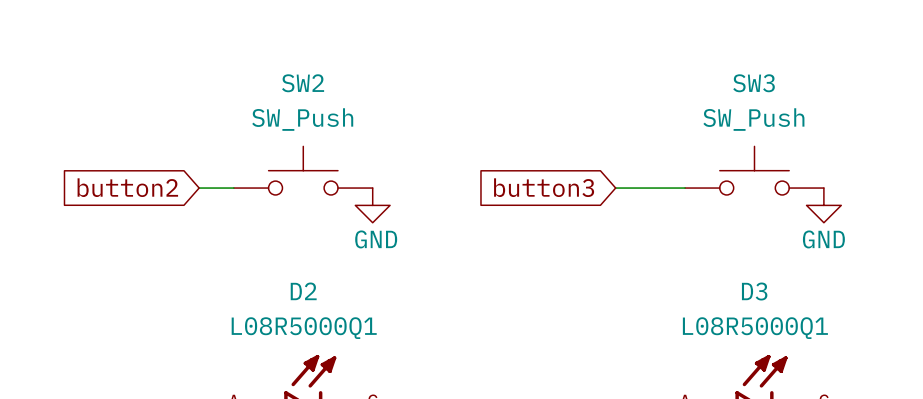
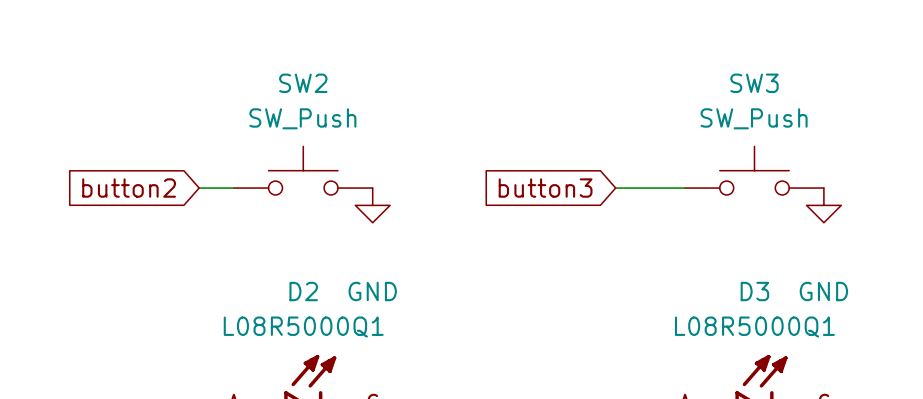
power symbol text position: GND (376, 239) -> GND (372, 291)
power symbol text position: GND (823, 239) -> GND (823, 291)

